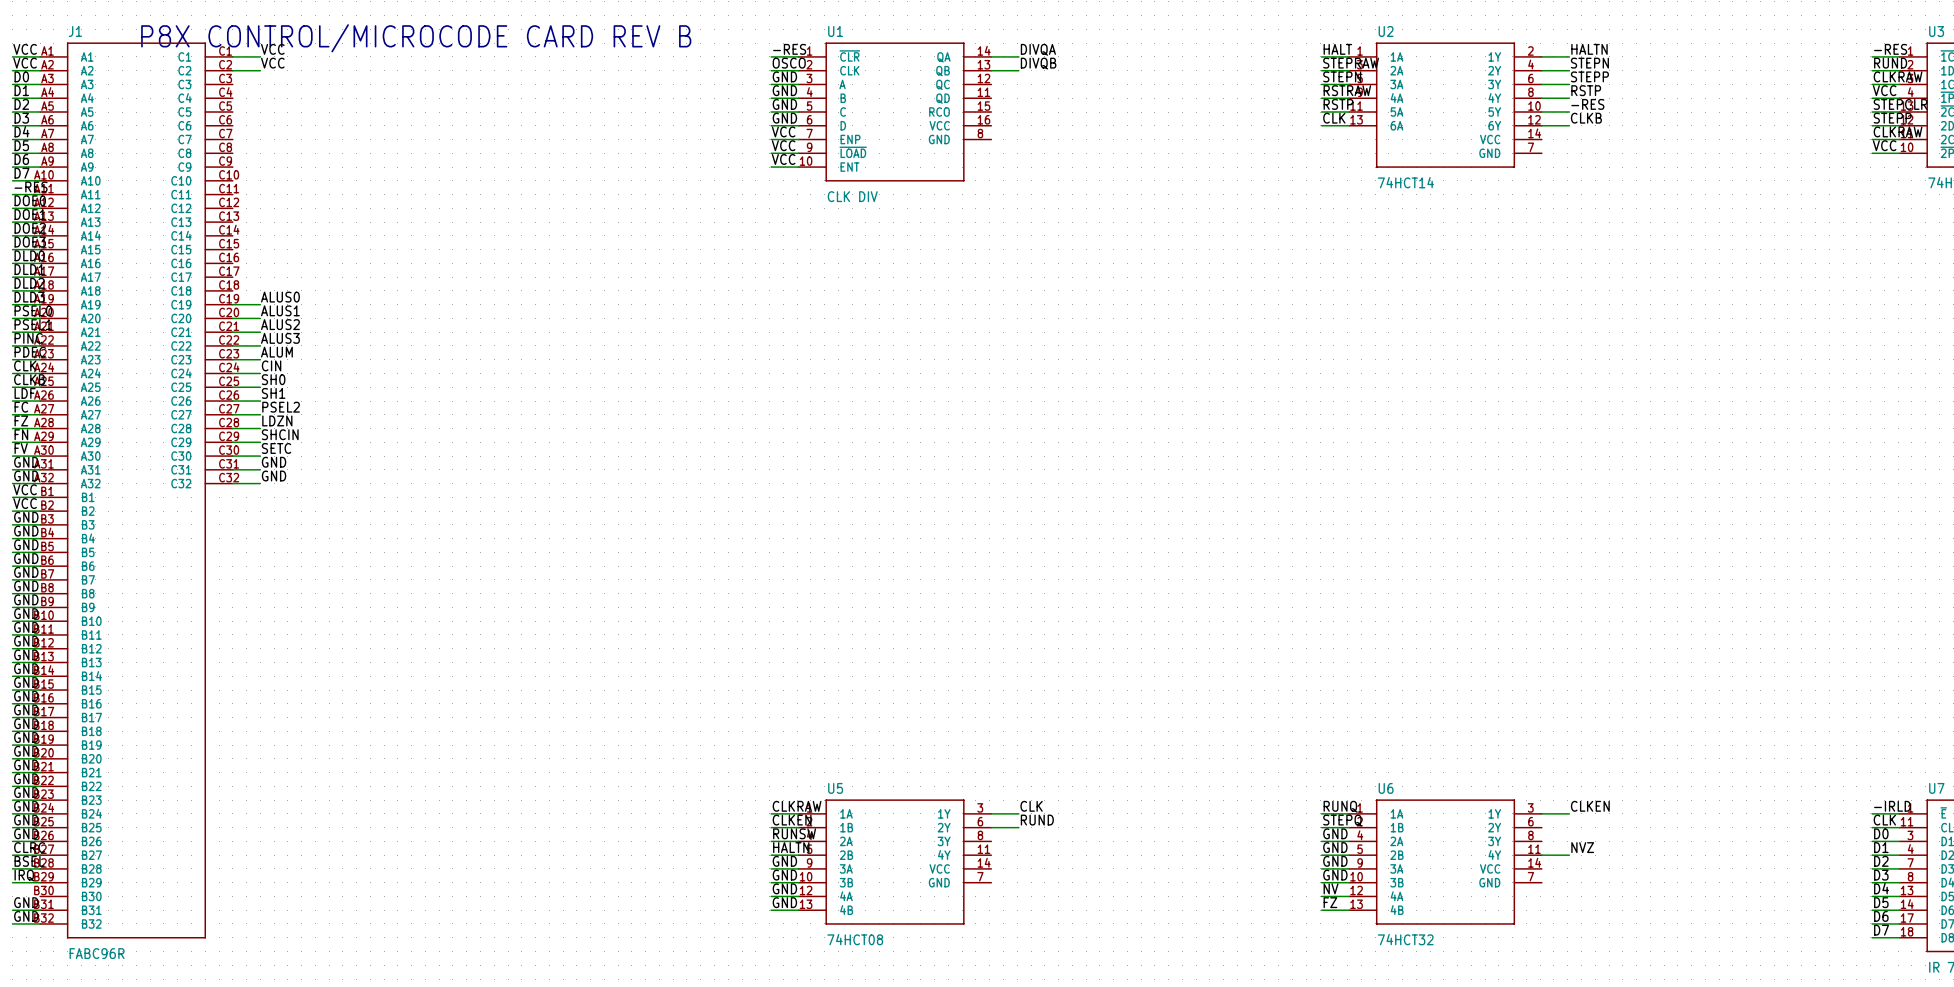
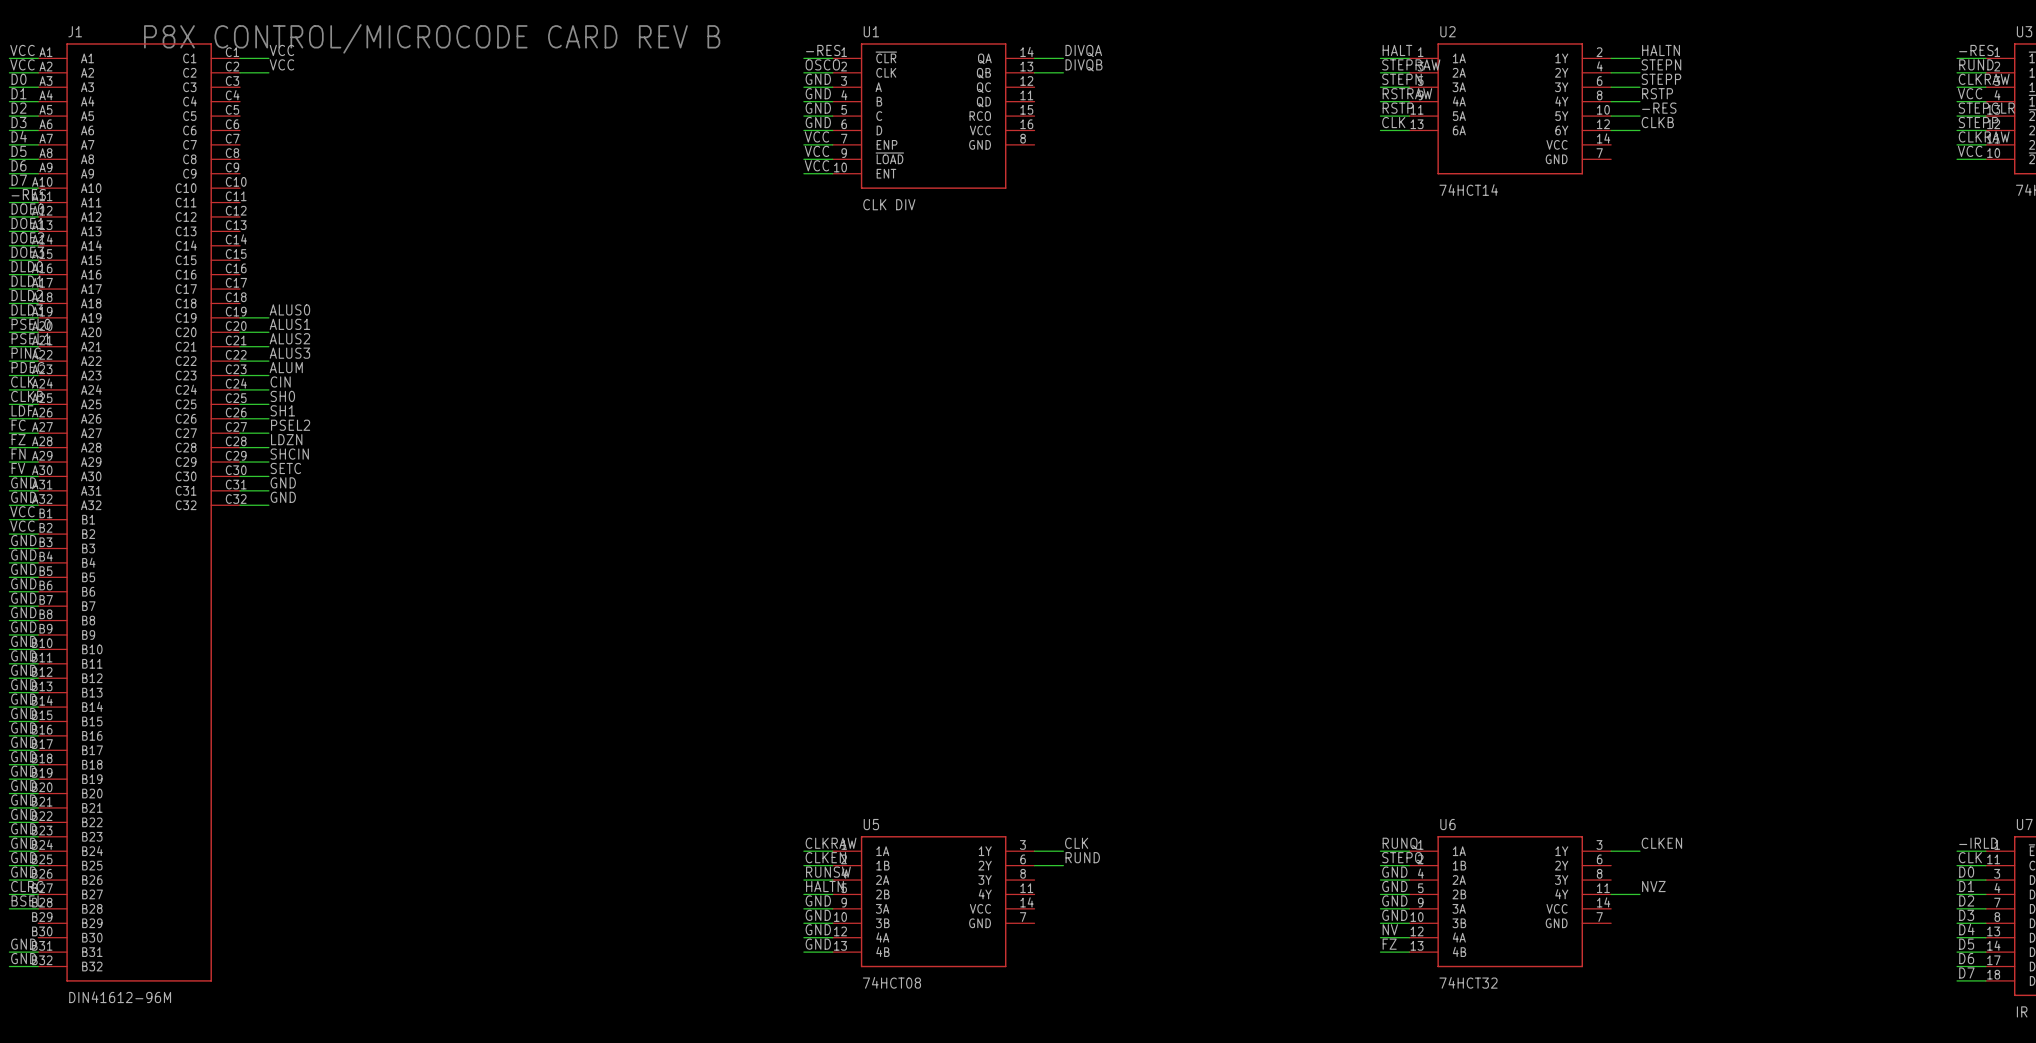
label: IRQ (24, 875) -> none
wire: (12, 882) (40, 882) -> none
J1 value: FABC96R (97, 953) -> DIN41612-96M (120, 997)

